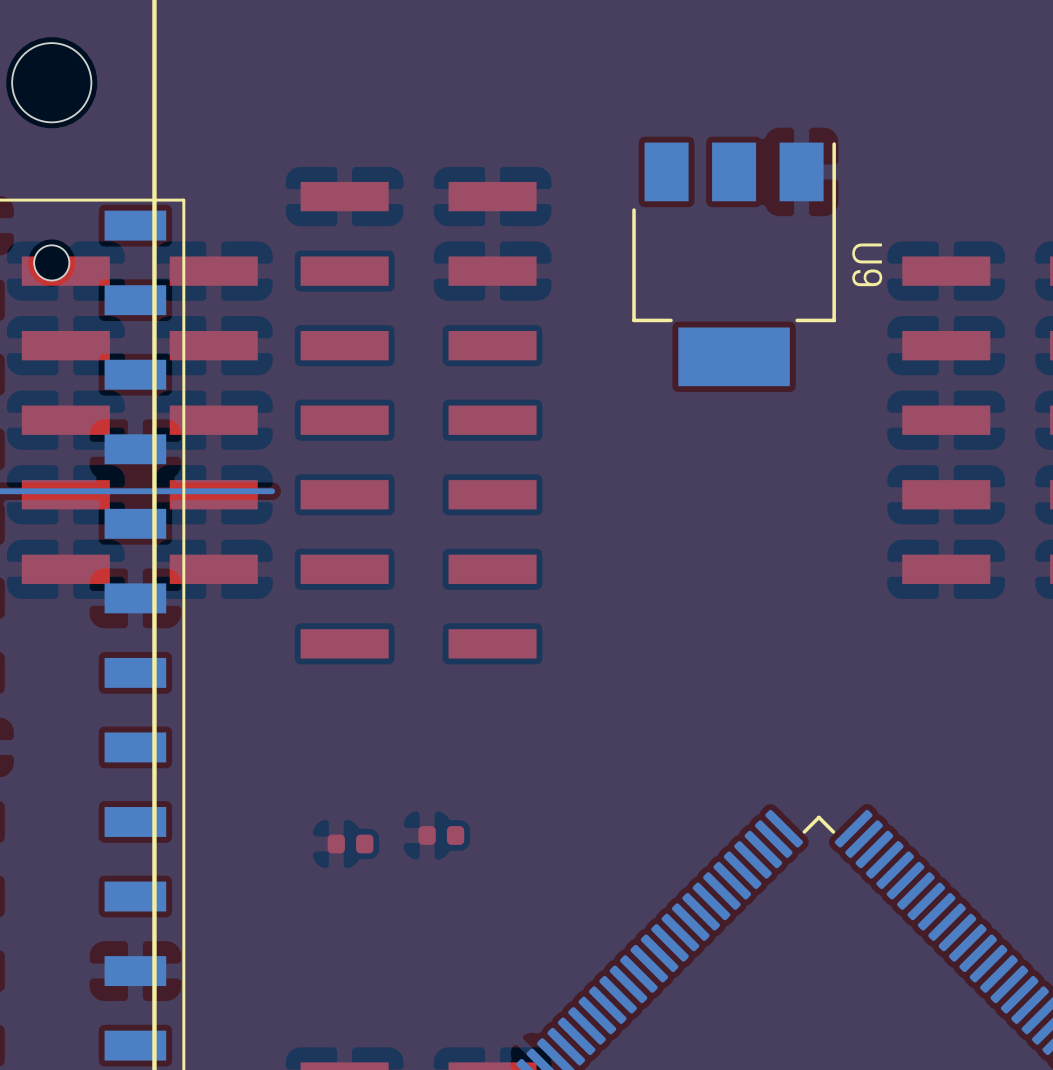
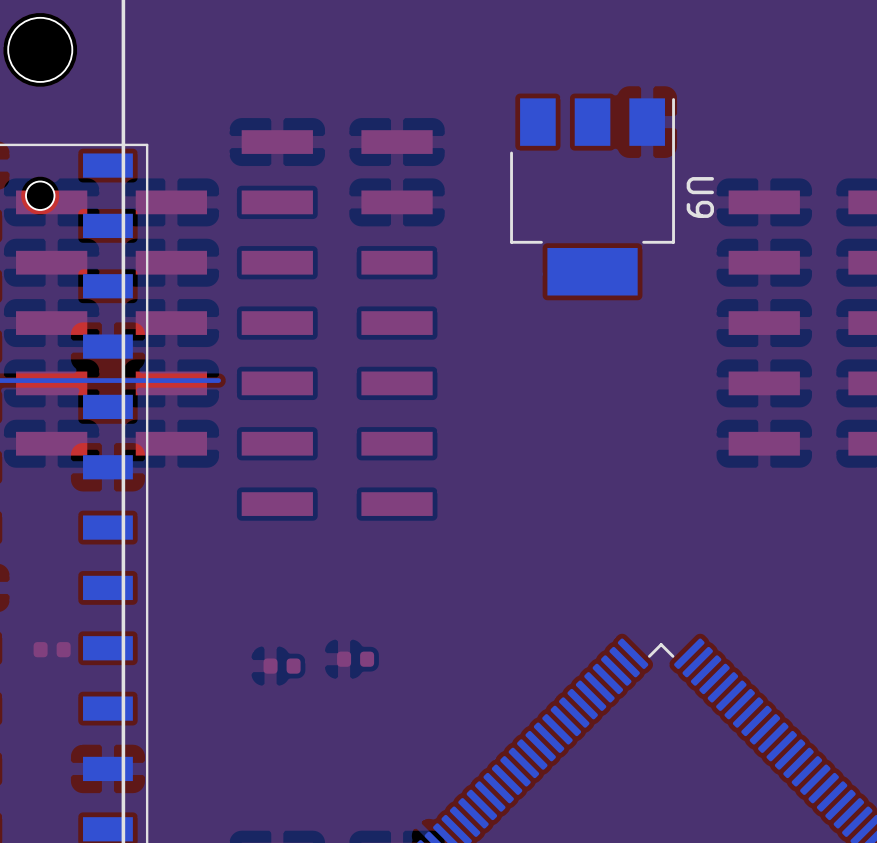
part: none -> (52, 649)

